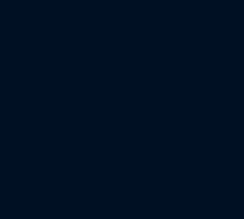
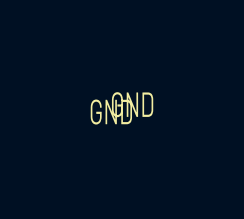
drawing: none -> [90, 92, 154, 125]

